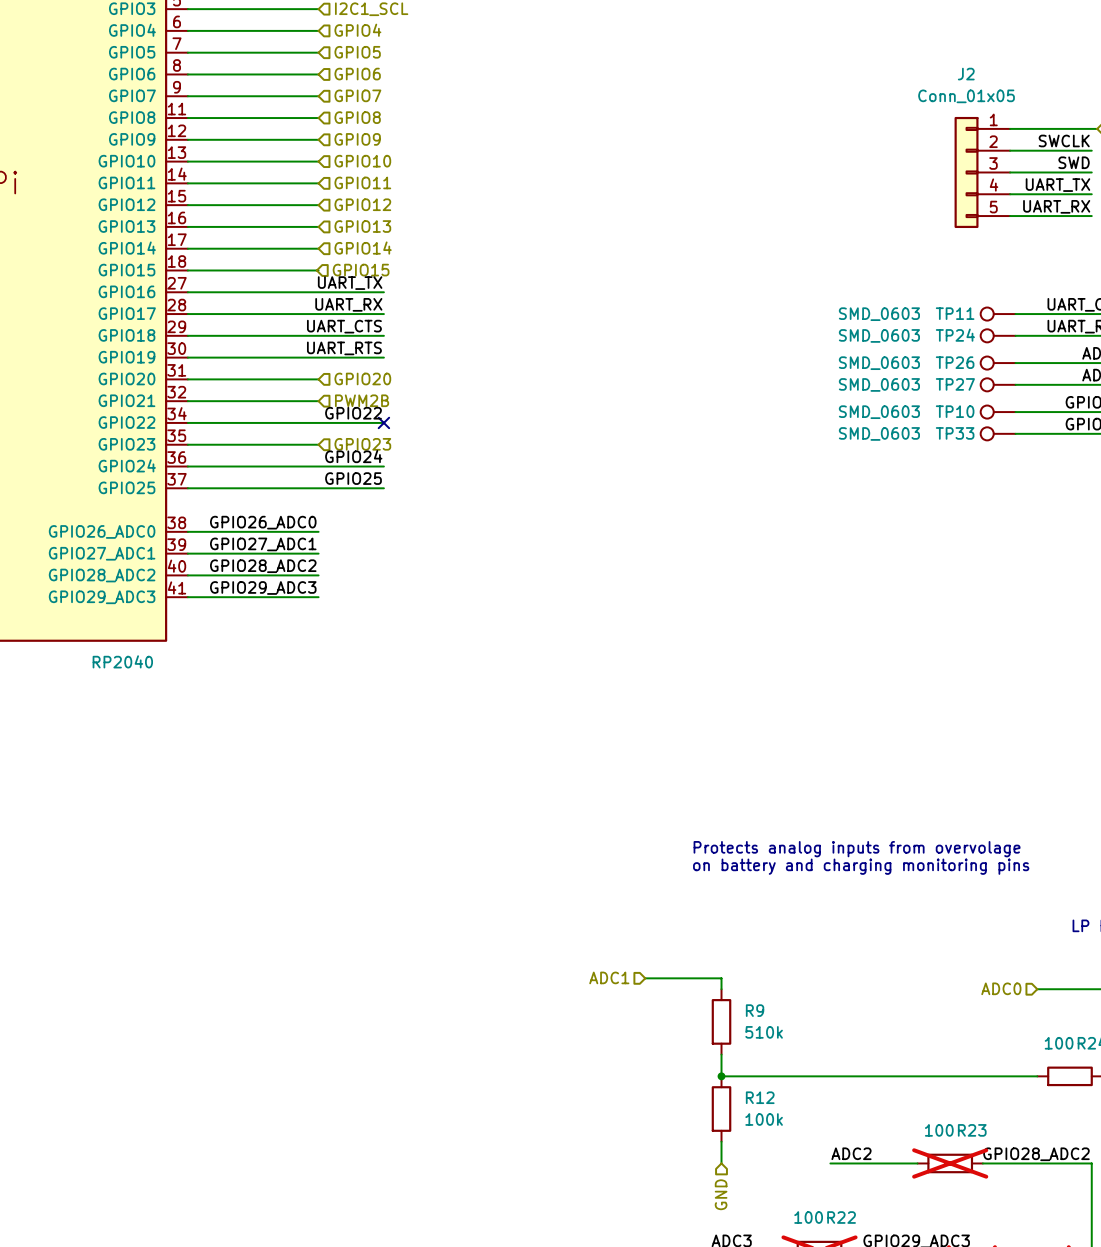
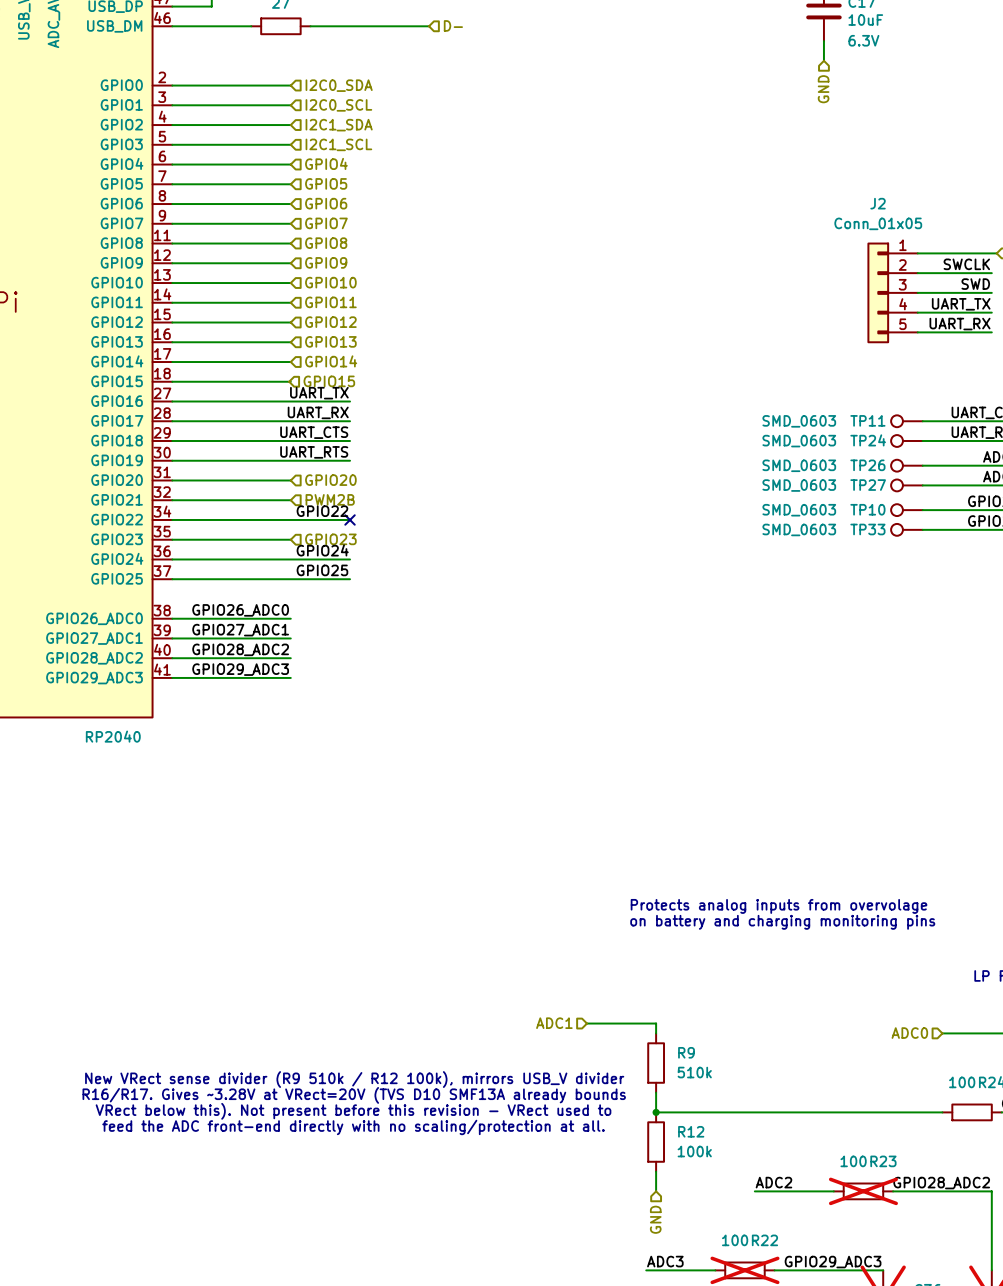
text: none -> New VRect sense divider (R9 510k / R12 100k), mirrors USB_V divider (354, 1079)
text: none -> R16/R17. Gives ~3.28V at VRect=20V (TVS D10 SMF13A already bounds (354, 1095)
text: none -> VRect below this). Not present before this revision - VRect used to (353, 1111)
text: none -> feed the ADC front-end directly with no scaling/protection at all. (353, 1127)

